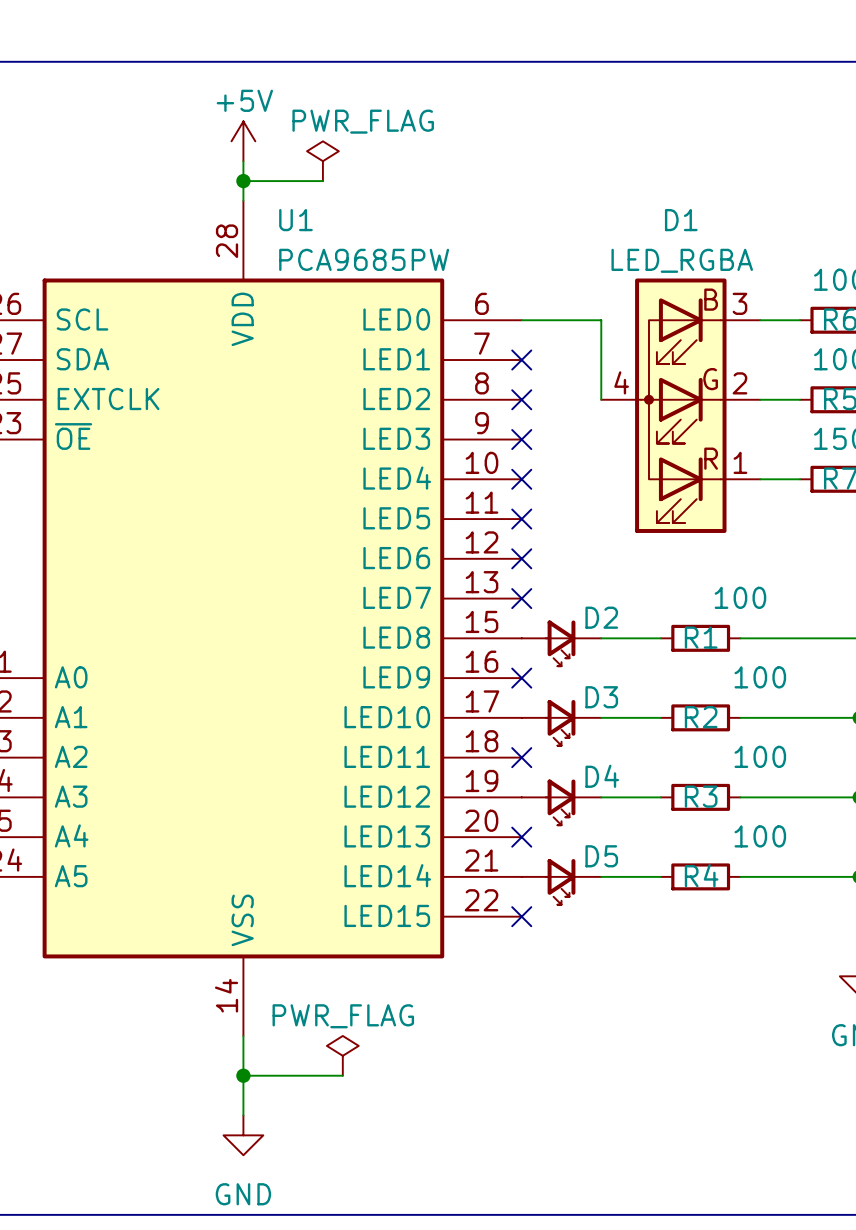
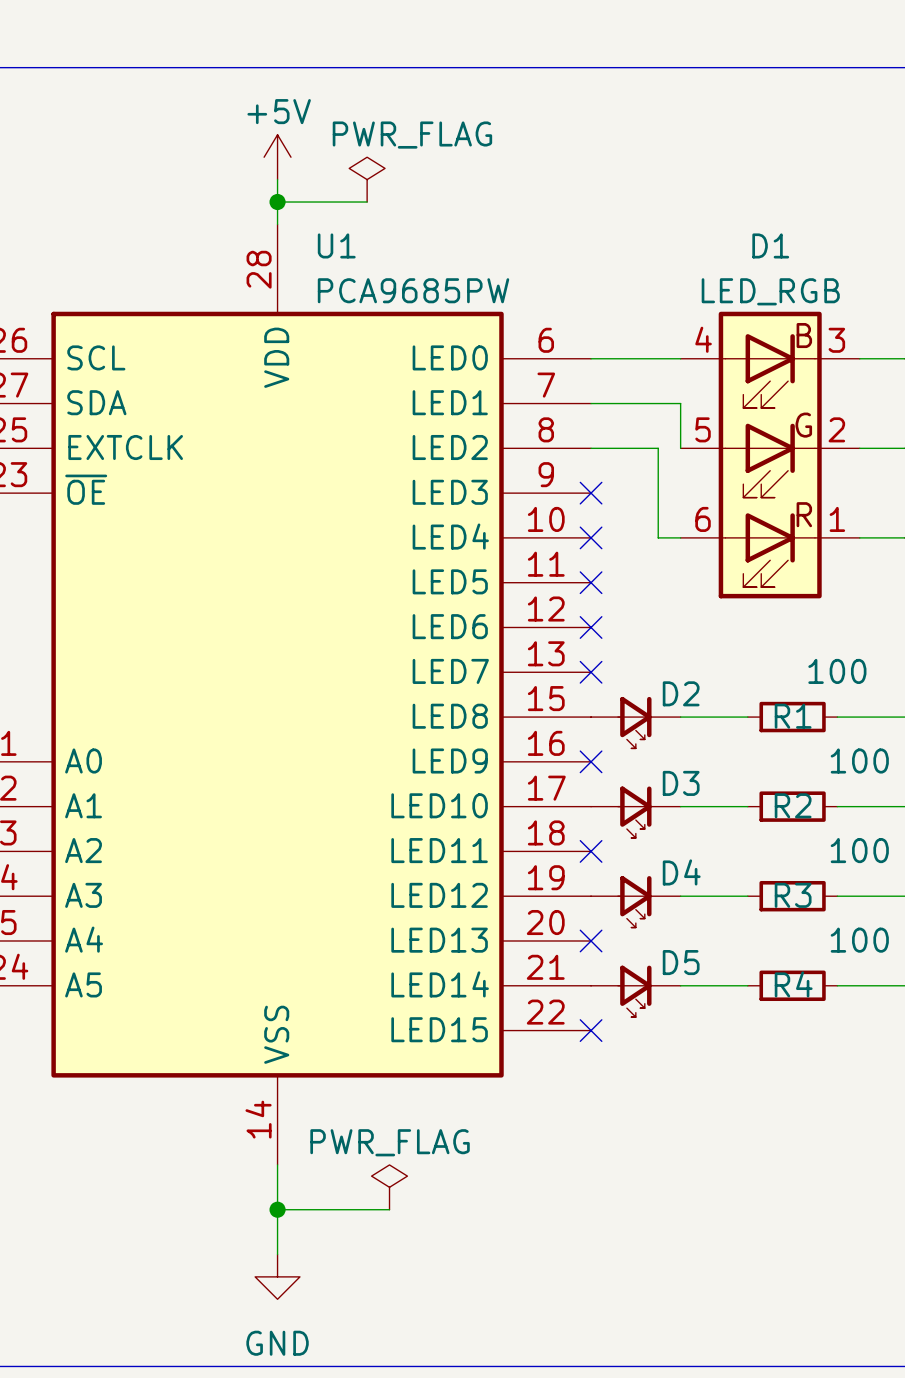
D1 value: LED_RGBA (682, 260) -> LED_RGB (770, 291)
D1 symbol: [601, 278, 761, 533] -> [680, 311, 860, 599]
wire: (601, 320) (601, 360) -> (591, 403) (680, 403)
no-connect mark: (521, 360) -> none
wire: none -> (591, 448) (658, 448) (658, 537) (680, 537)
no-connect mark: (521, 399) -> none

